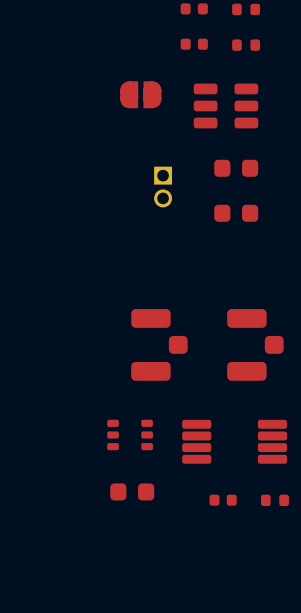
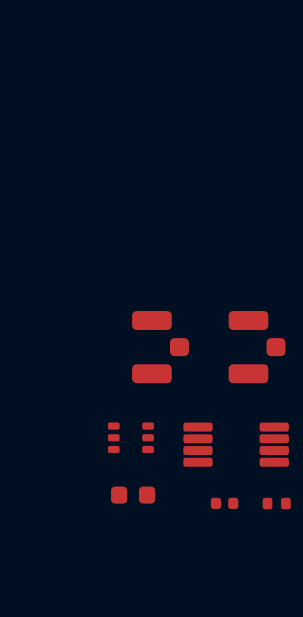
part: (194, 8) -> none
part: (246, 9) -> none
part: (194, 44) -> none
part: (246, 45) -> none
part: (140, 94) -> none
part: (225, 105) -> none
part: (236, 168) -> none
part: (163, 187) -> none
part: (236, 213) -> none

